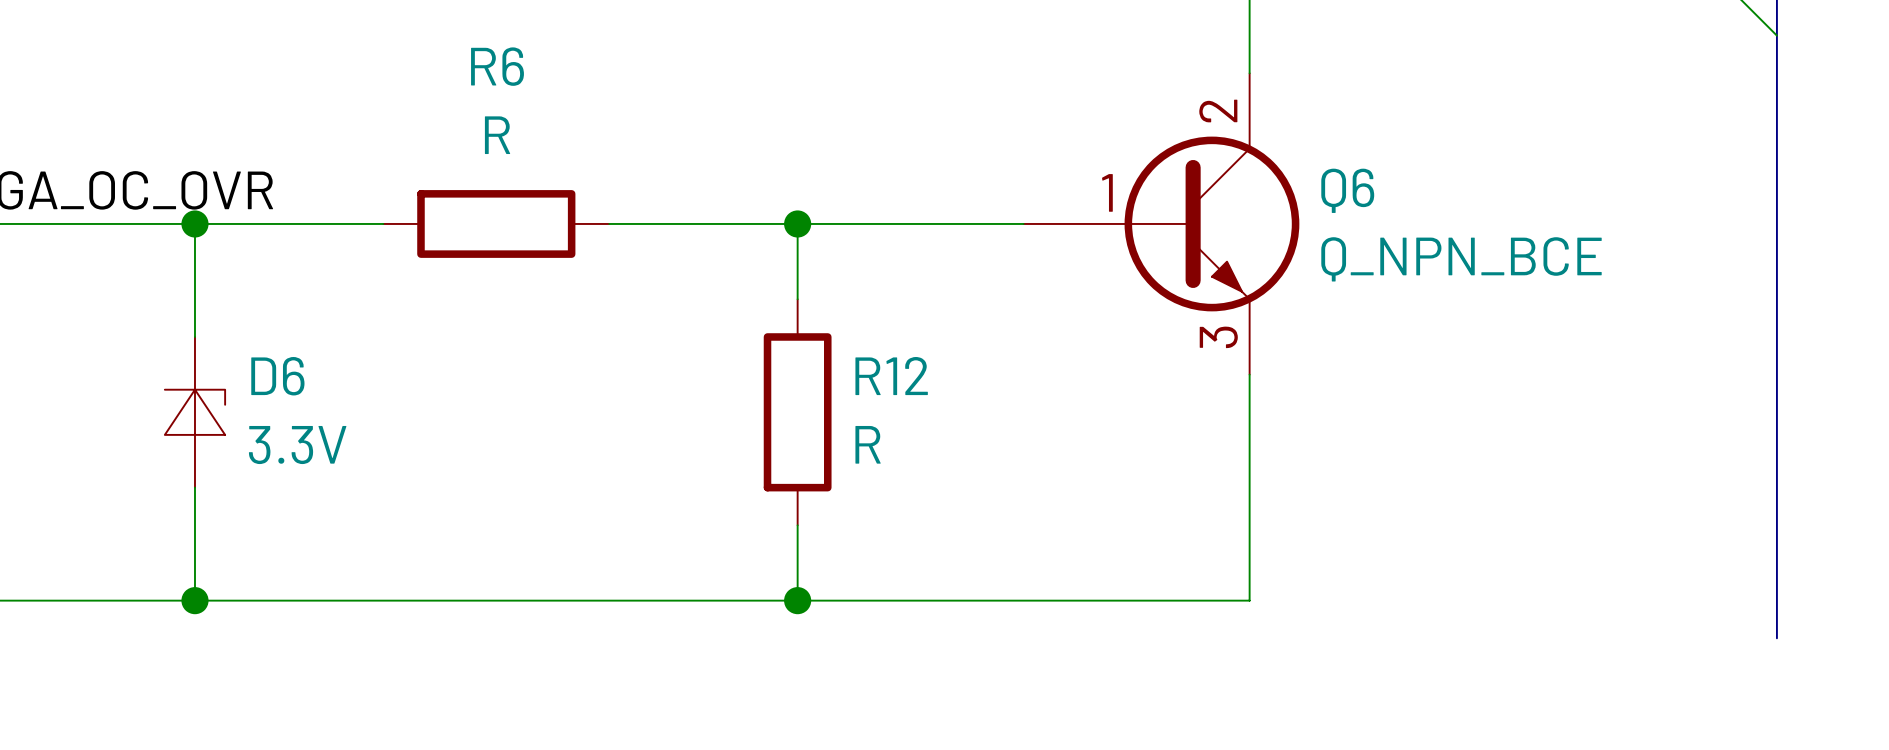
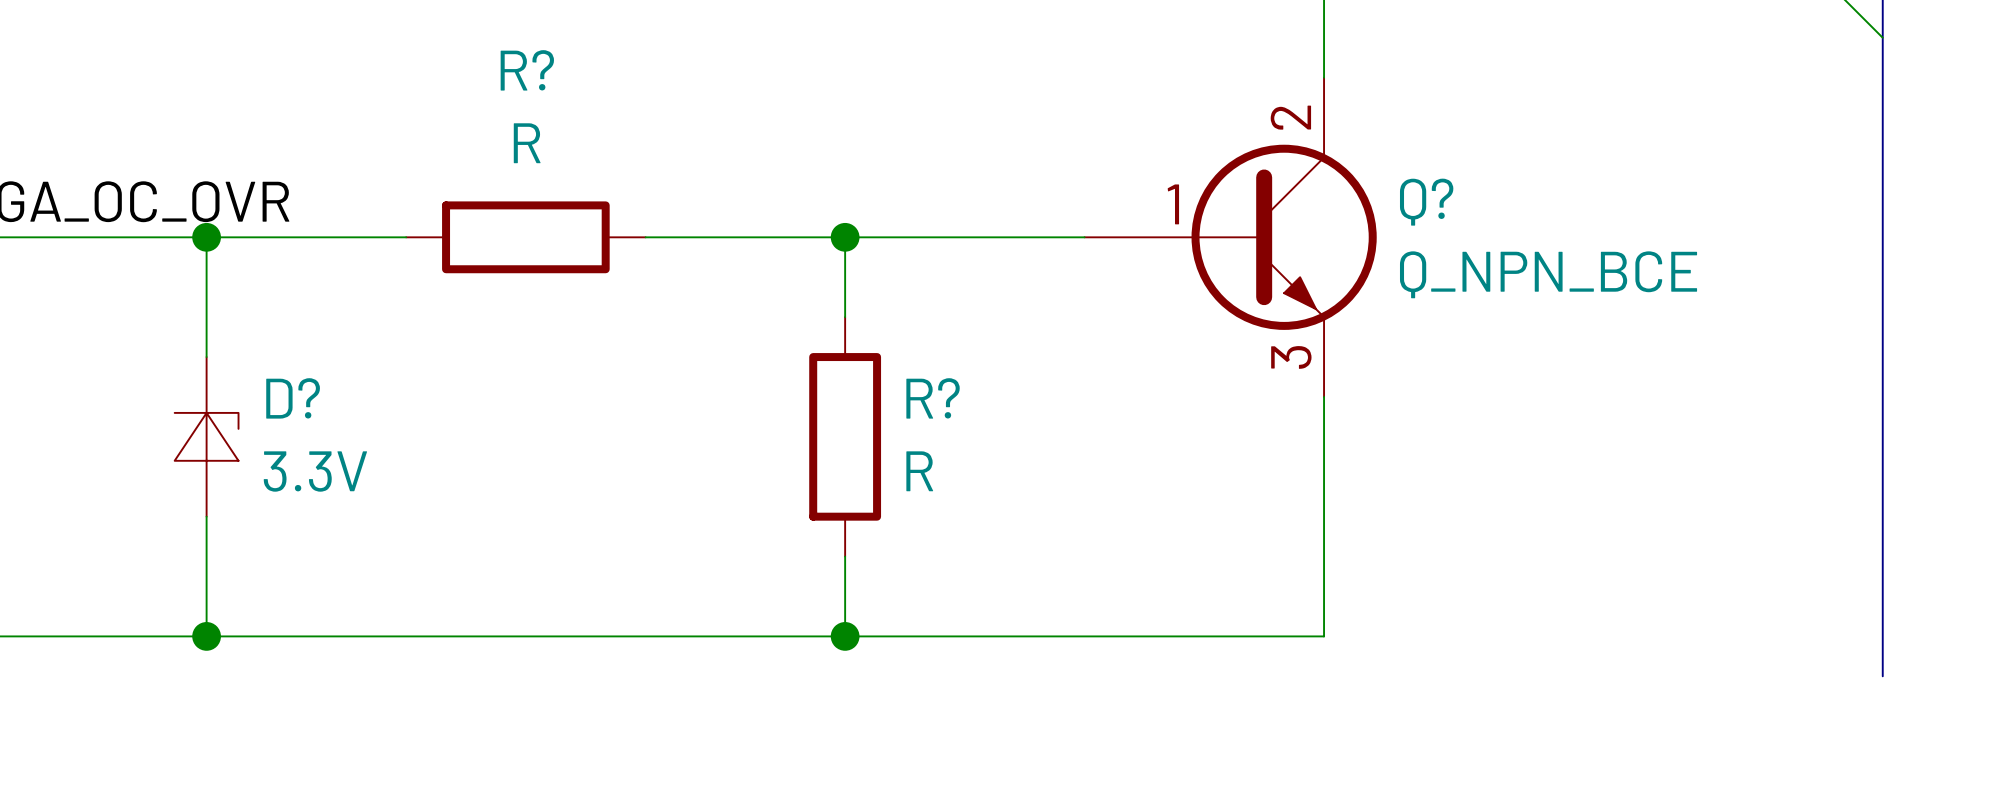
R6 name: R6 (497, 66) -> R? (527, 70)
Q6 name: Q6 (1347, 190) -> Q? (1426, 202)
D6 name: D6 (277, 376) -> D? (293, 398)
R12 name: R12 (891, 376) -> R? (933, 398)

